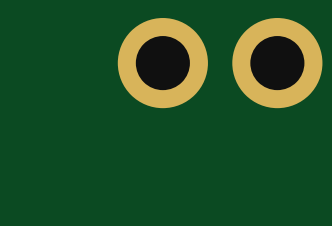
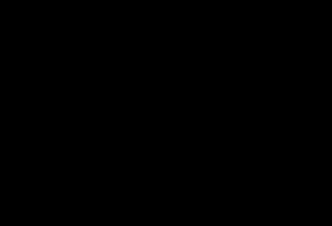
part: (220, 63) -> none

